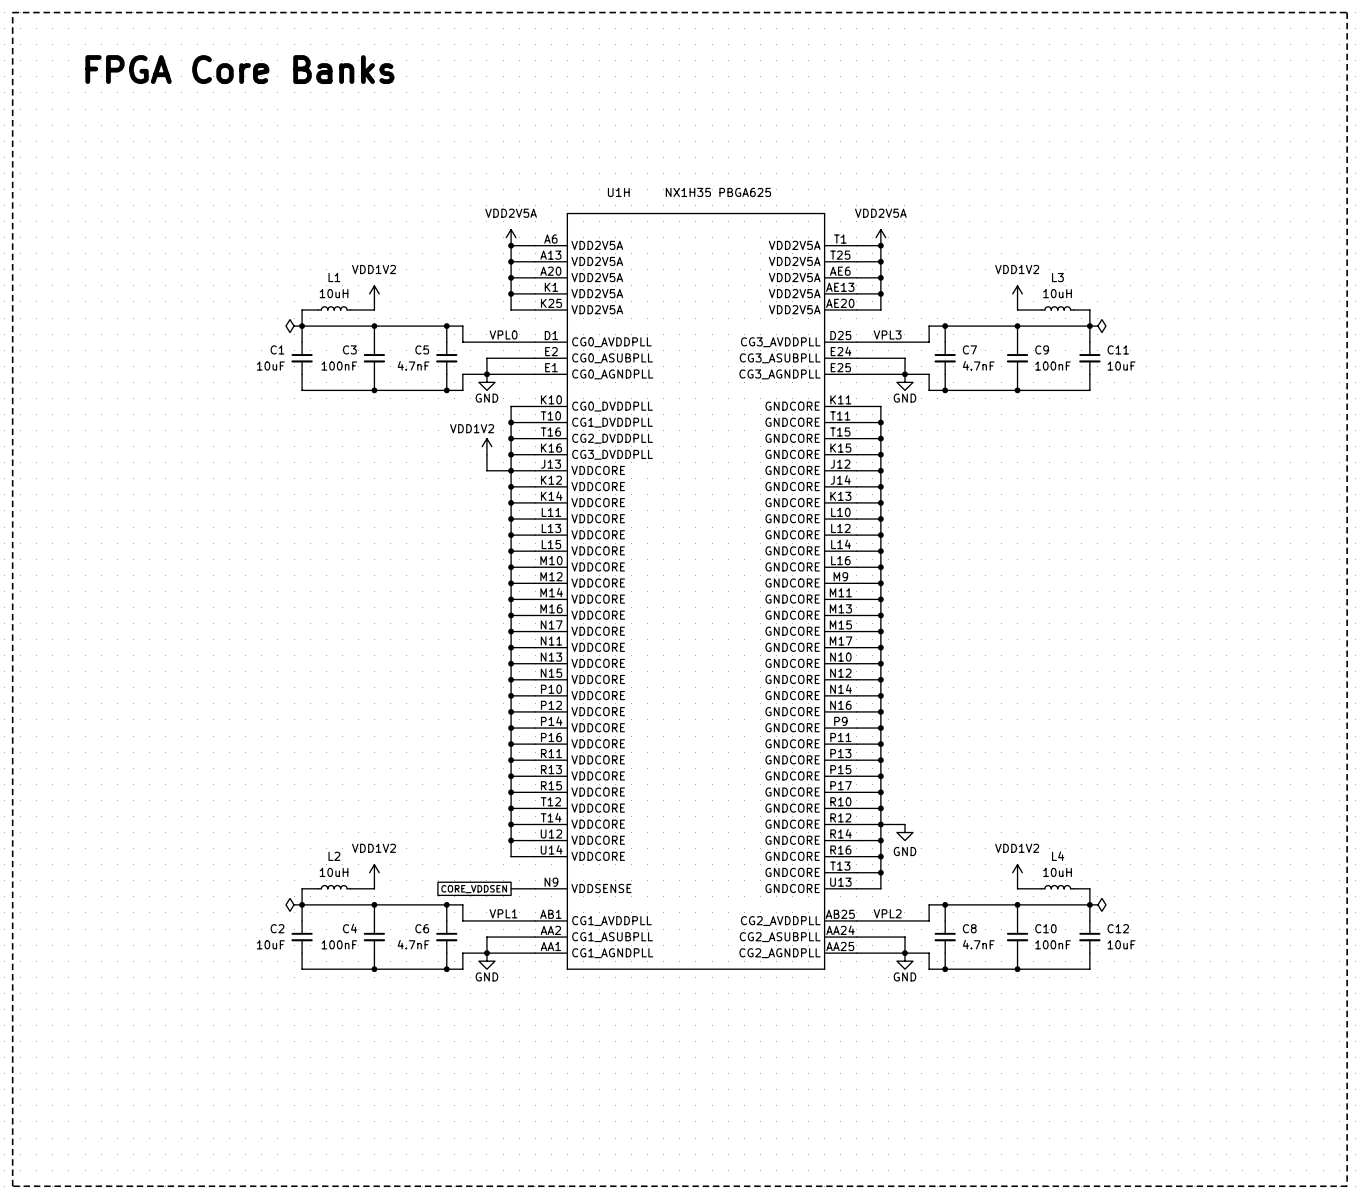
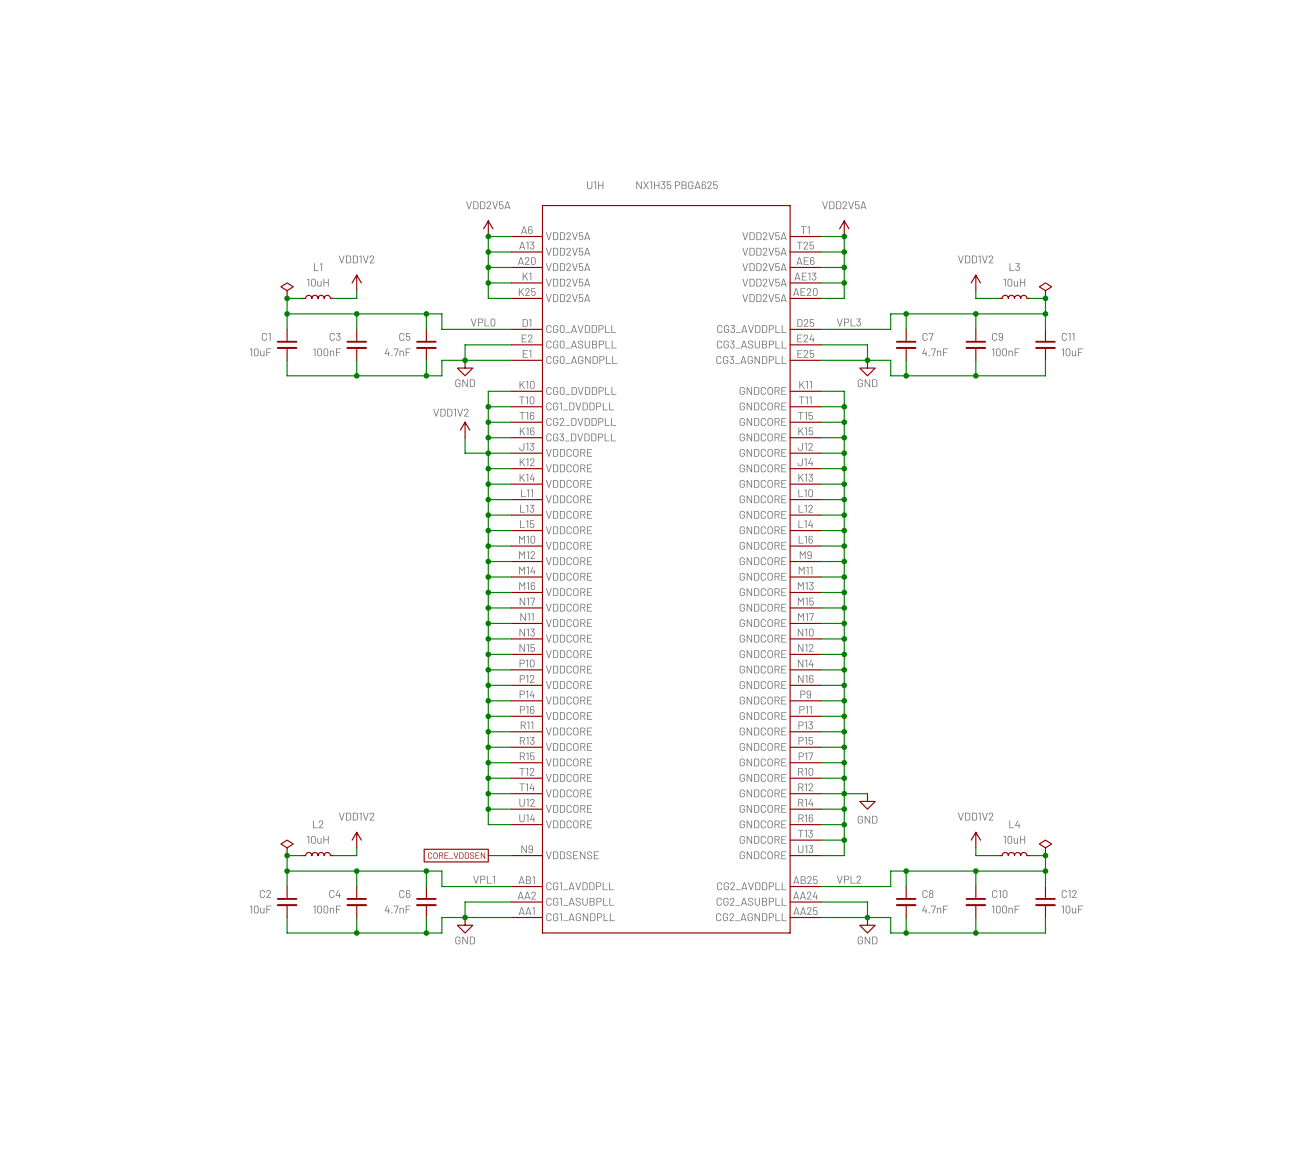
line: (12, 12) (1347, 12) (1347, 1186) (12, 1186) (12, 12) -> none
text: FPGA Core Banks (239, 69) -> none
junction: none -> (287, 298)
junction: none -> (1045, 298)
power symbol rotation: 0° (294, 326) -> 90° clockwise (287, 290)
power symbol position: (294, 326) -> (287, 290)
power symbol rotation: 0° (1097, 326) -> 90° counterclockwise (1045, 290)
power symbol position: (1097, 326) -> (1045, 290)
junction: none -> (287, 855)
junction: none -> (1045, 855)
power symbol rotation: 0° (294, 904) -> 90° clockwise (287, 847)
power symbol position: (294, 904) -> (287, 847)
power symbol rotation: 0° (1097, 904) -> 90° counterclockwise (1045, 847)
power symbol position: (1097, 904) -> (1045, 847)

